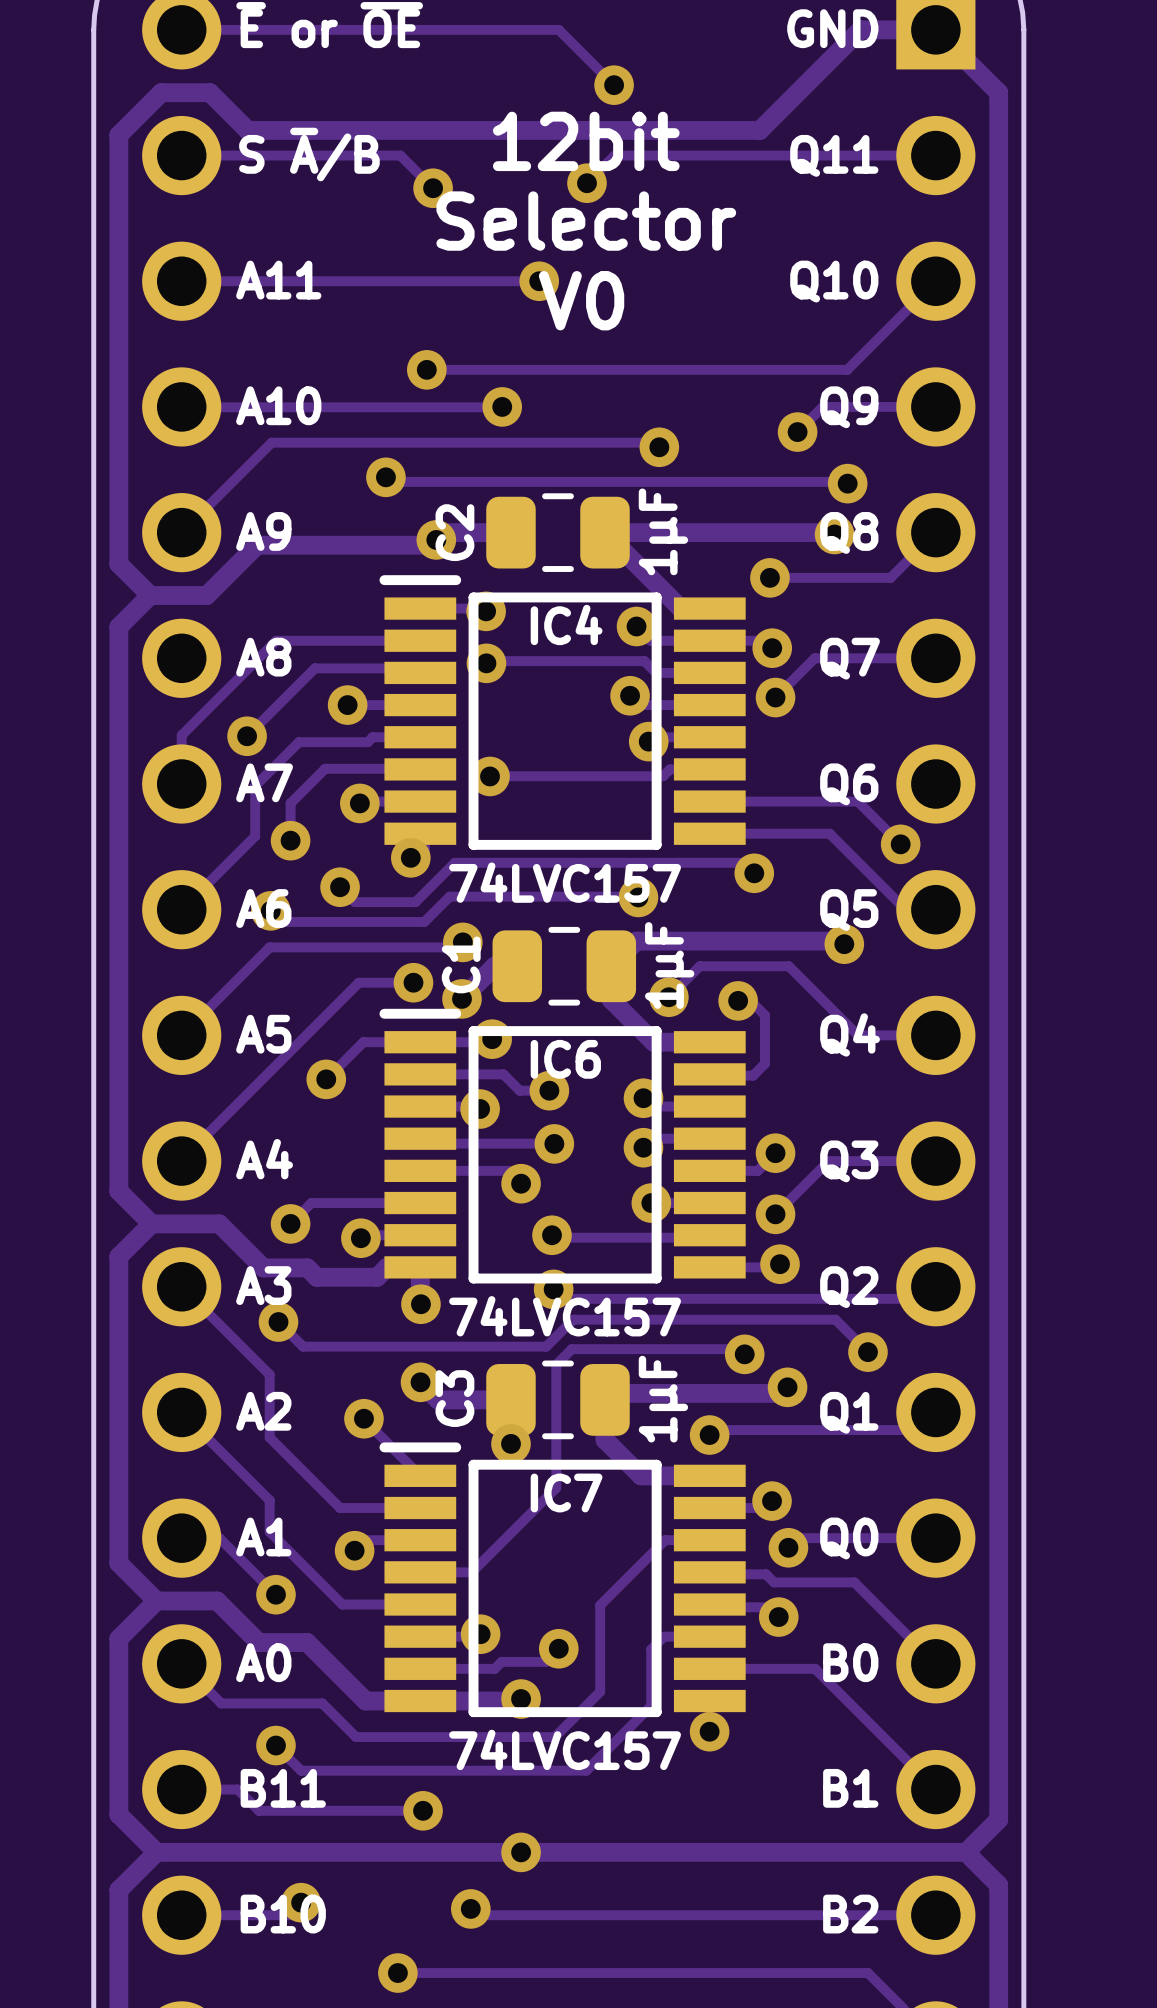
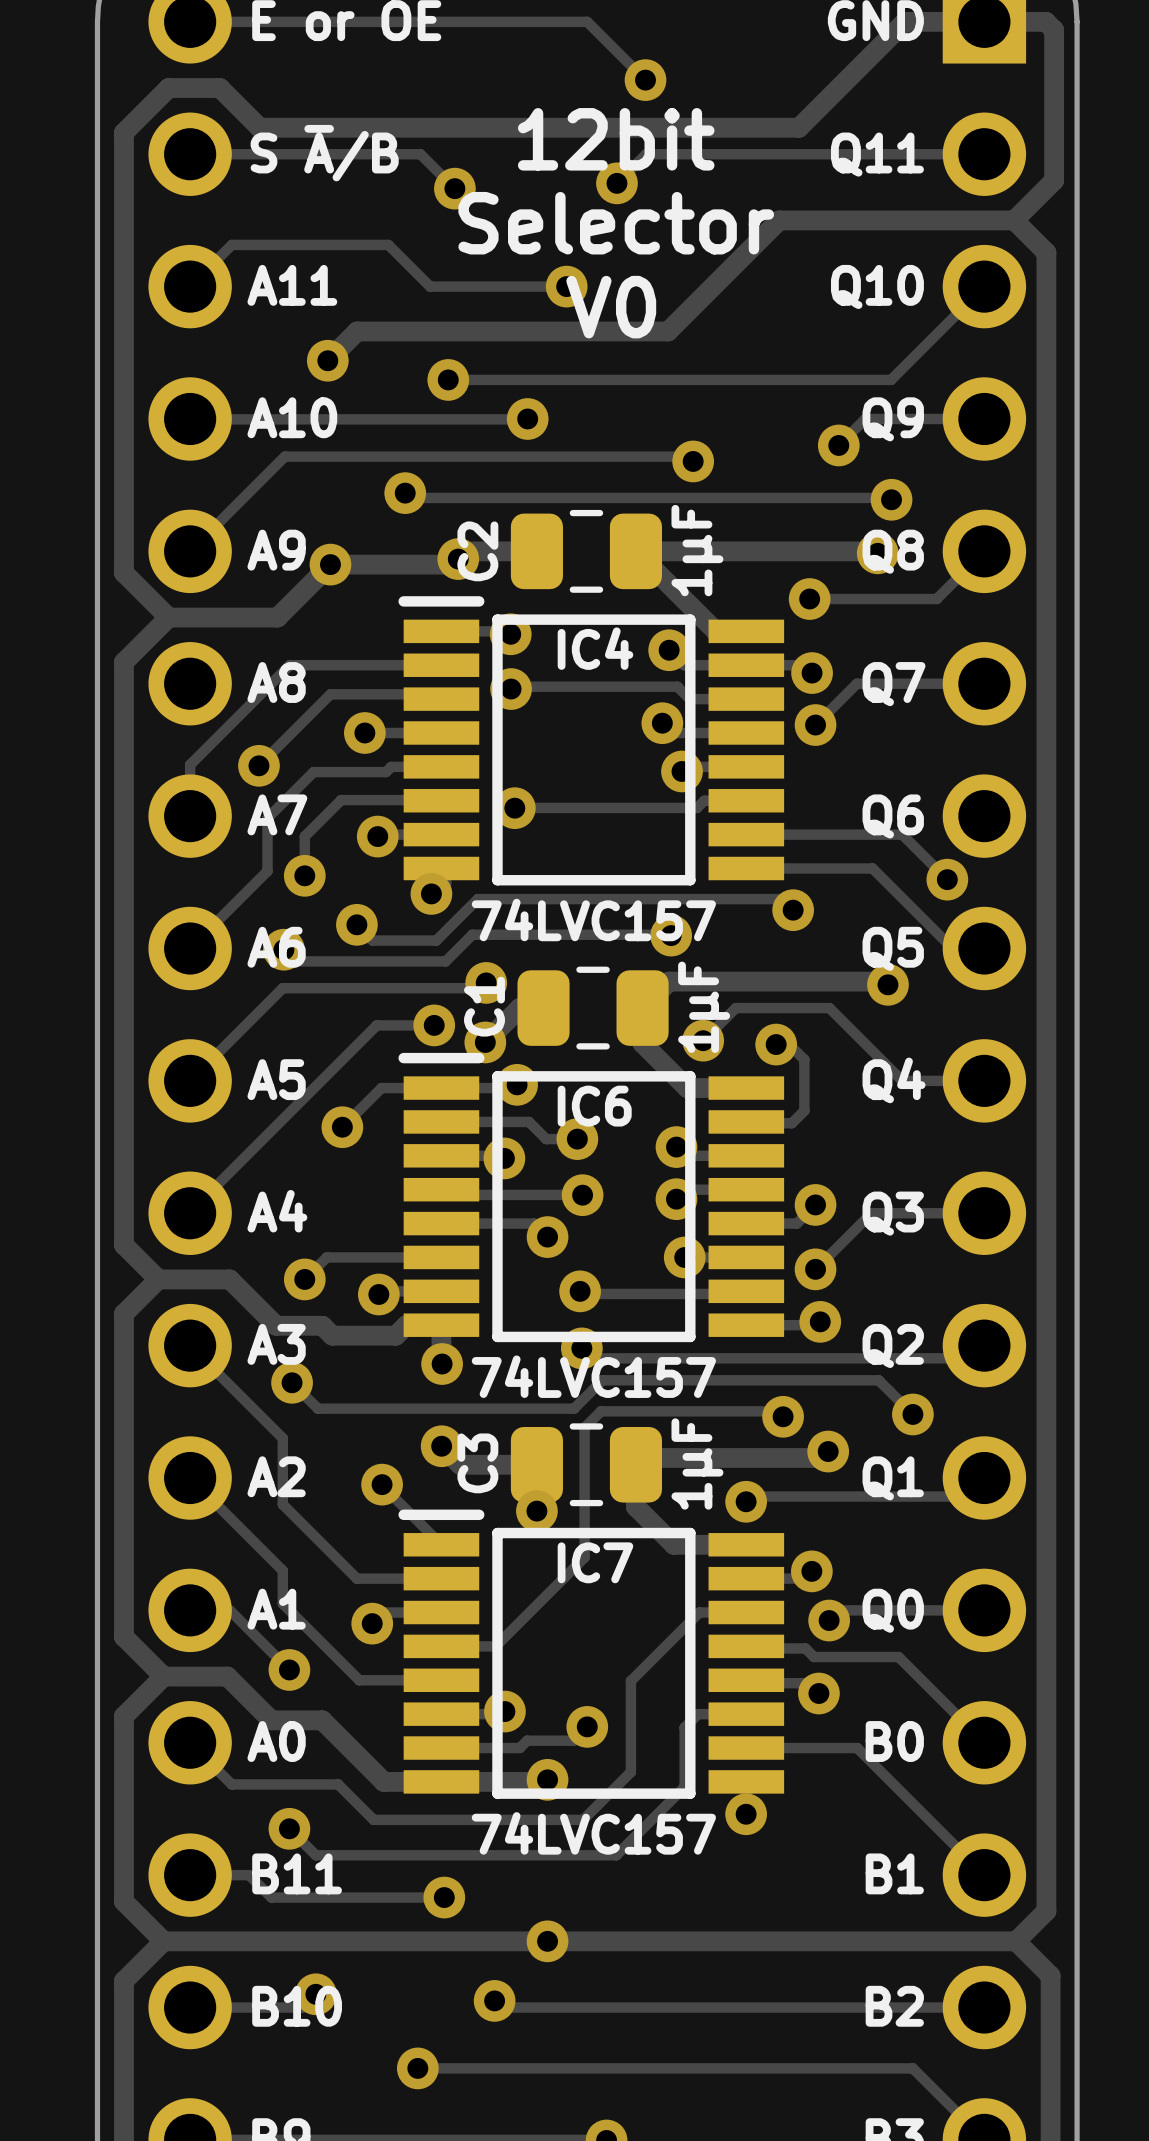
track: (935, 29) (998, 92) (998, 1819) (994, 1823) -> (1014, 220) (1046, 252) (1046, 1911)
track: none -> (984, 21) (1045, 21) (1054, 30) (1054, 180) (1014, 220)
track: none -> (1014, 220) (779, 220) (668, 331) (357, 331) (327, 360)
track: (181, 281) (409, 281) -> (190, 286) (231, 244) (388, 244) (430, 286)
via: none -> (327, 360)
track: (314, 545) (257, 545) (206, 595) -> (330, 564) (277, 617) (216, 617)
via: none -> (330, 564)
track: (118, 553) (118, 564) (150, 595) -> none
track: (150, 595) (118, 626) (118, 637) -> (123, 572) (168, 617) (123, 662)

